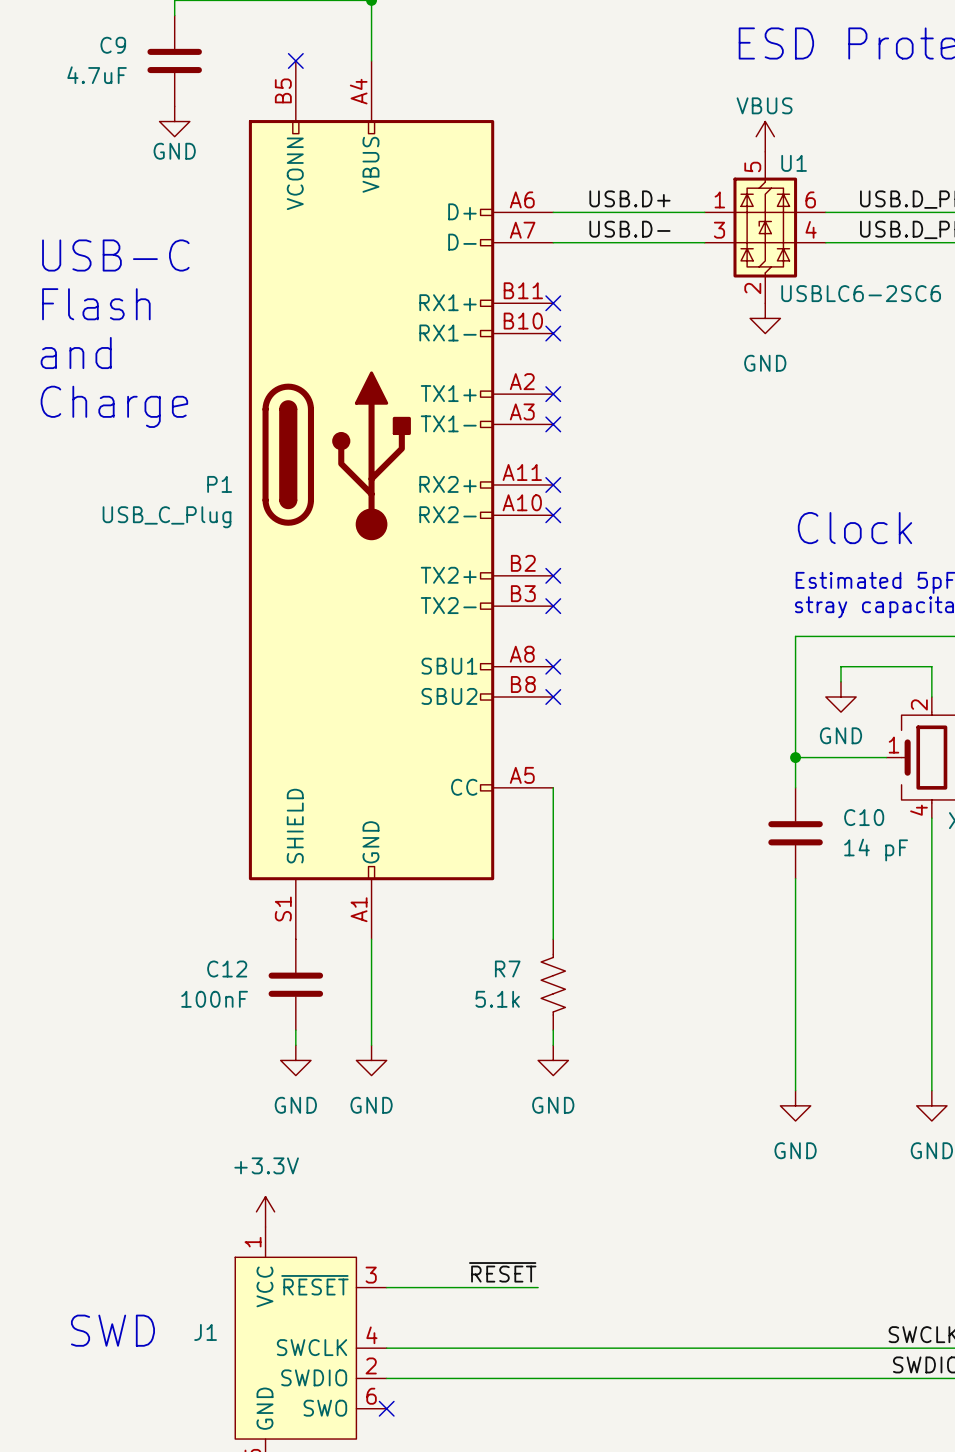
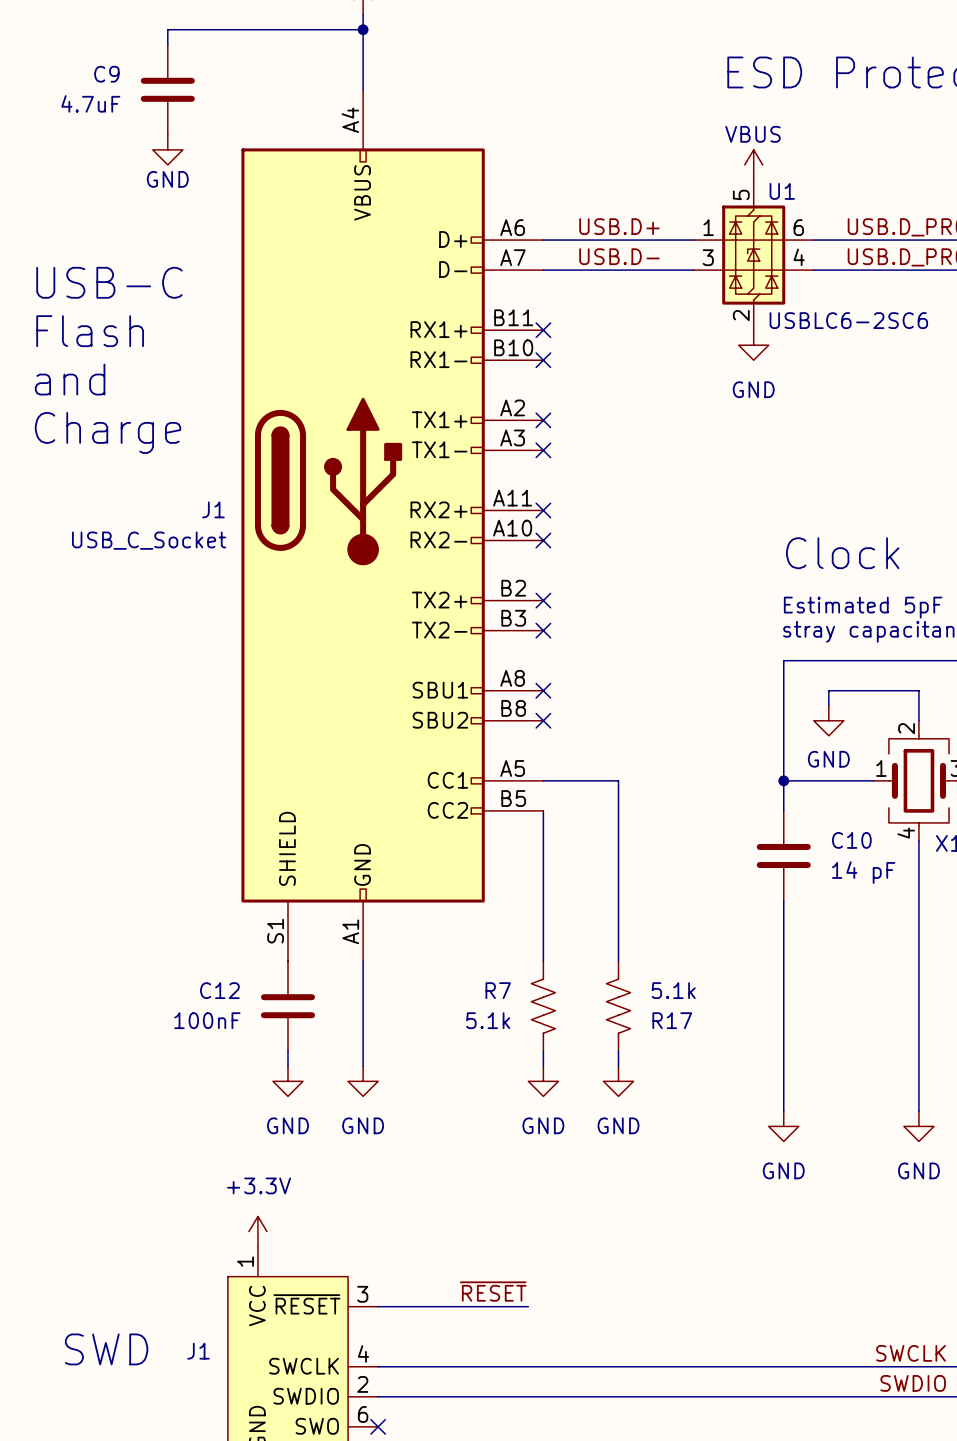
no-connect mark: (295, 60) -> none
P1: USB_C_Plug (401, 500) -> none
J1: none -> USB_C_Socket (392, 525)
wire: none -> (543, 780) (618, 780) (618, 961)
R17: none -> 5.1k (618, 1006)
wire: none -> (618, 1051) (618, 1066)
power symbol: none -> GND (618, 1081)

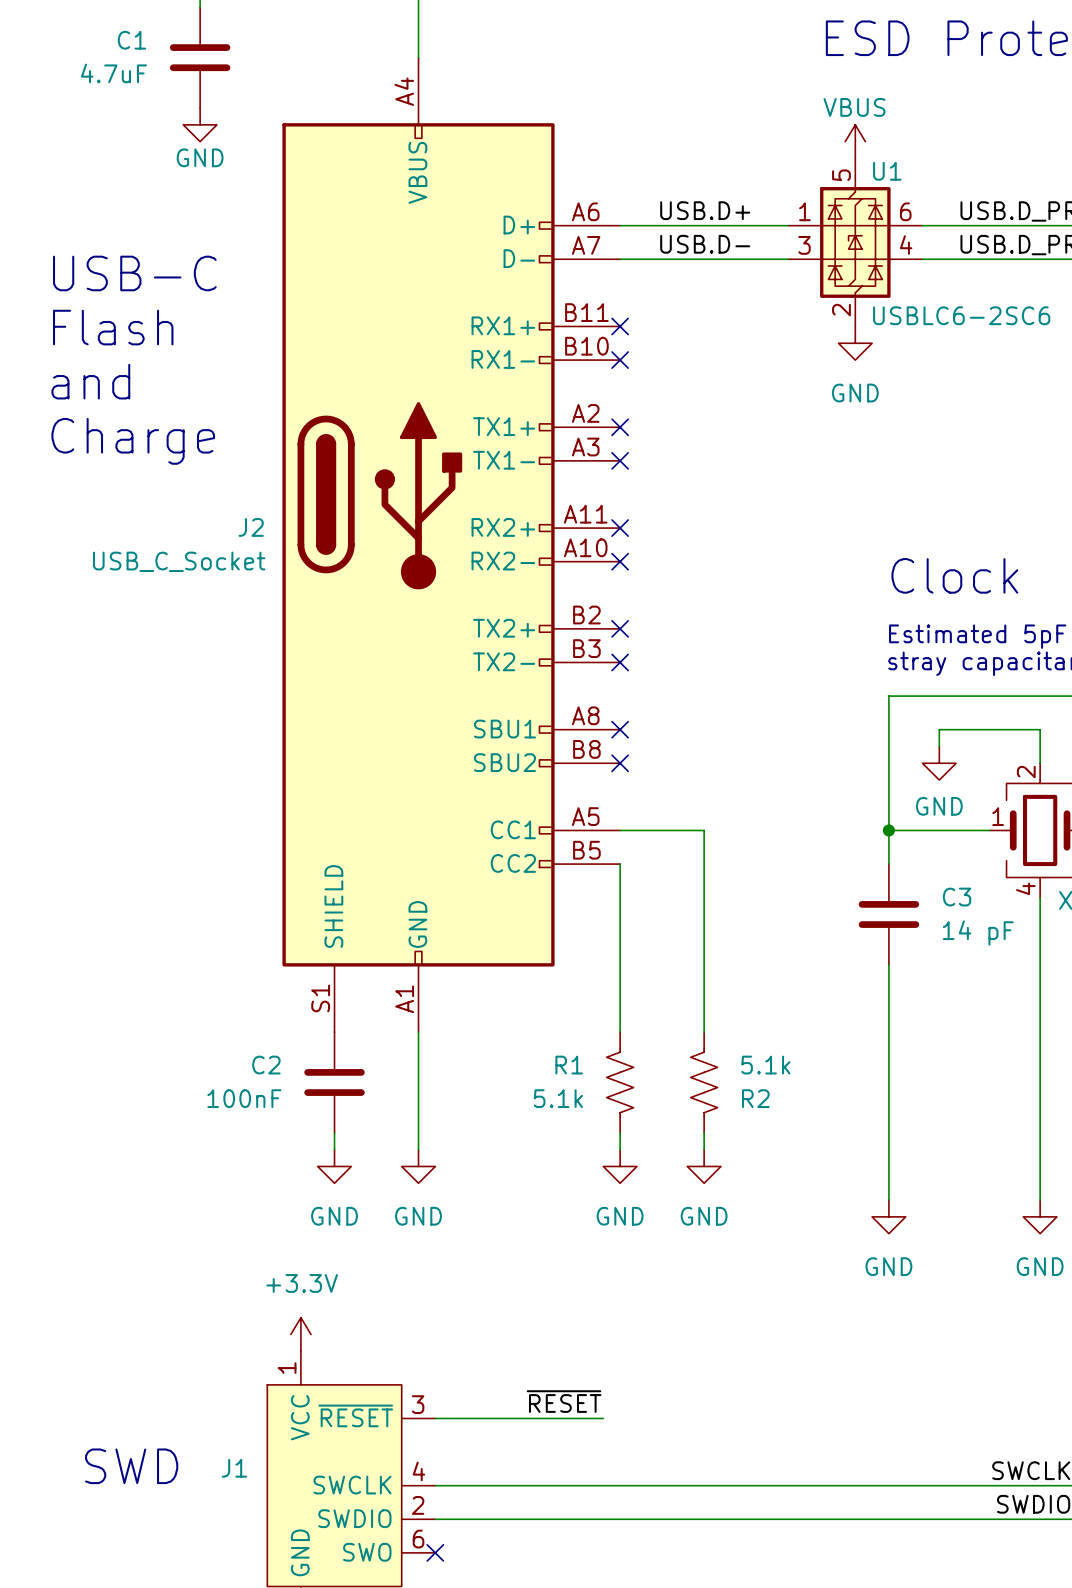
C9 name: C9 (106, 74) -> C1 (131, 40)
J1 name: J1 (213, 509) -> J2 (251, 527)
C10 name: C10 (851, 840) -> C3 (957, 897)
C12 name: C12 (219, 990) -> C2 (266, 1065)
R7 name: R7 (498, 990) -> R1 (569, 1065)
R17 name: R17 (672, 1020) -> R2 (755, 1098)

